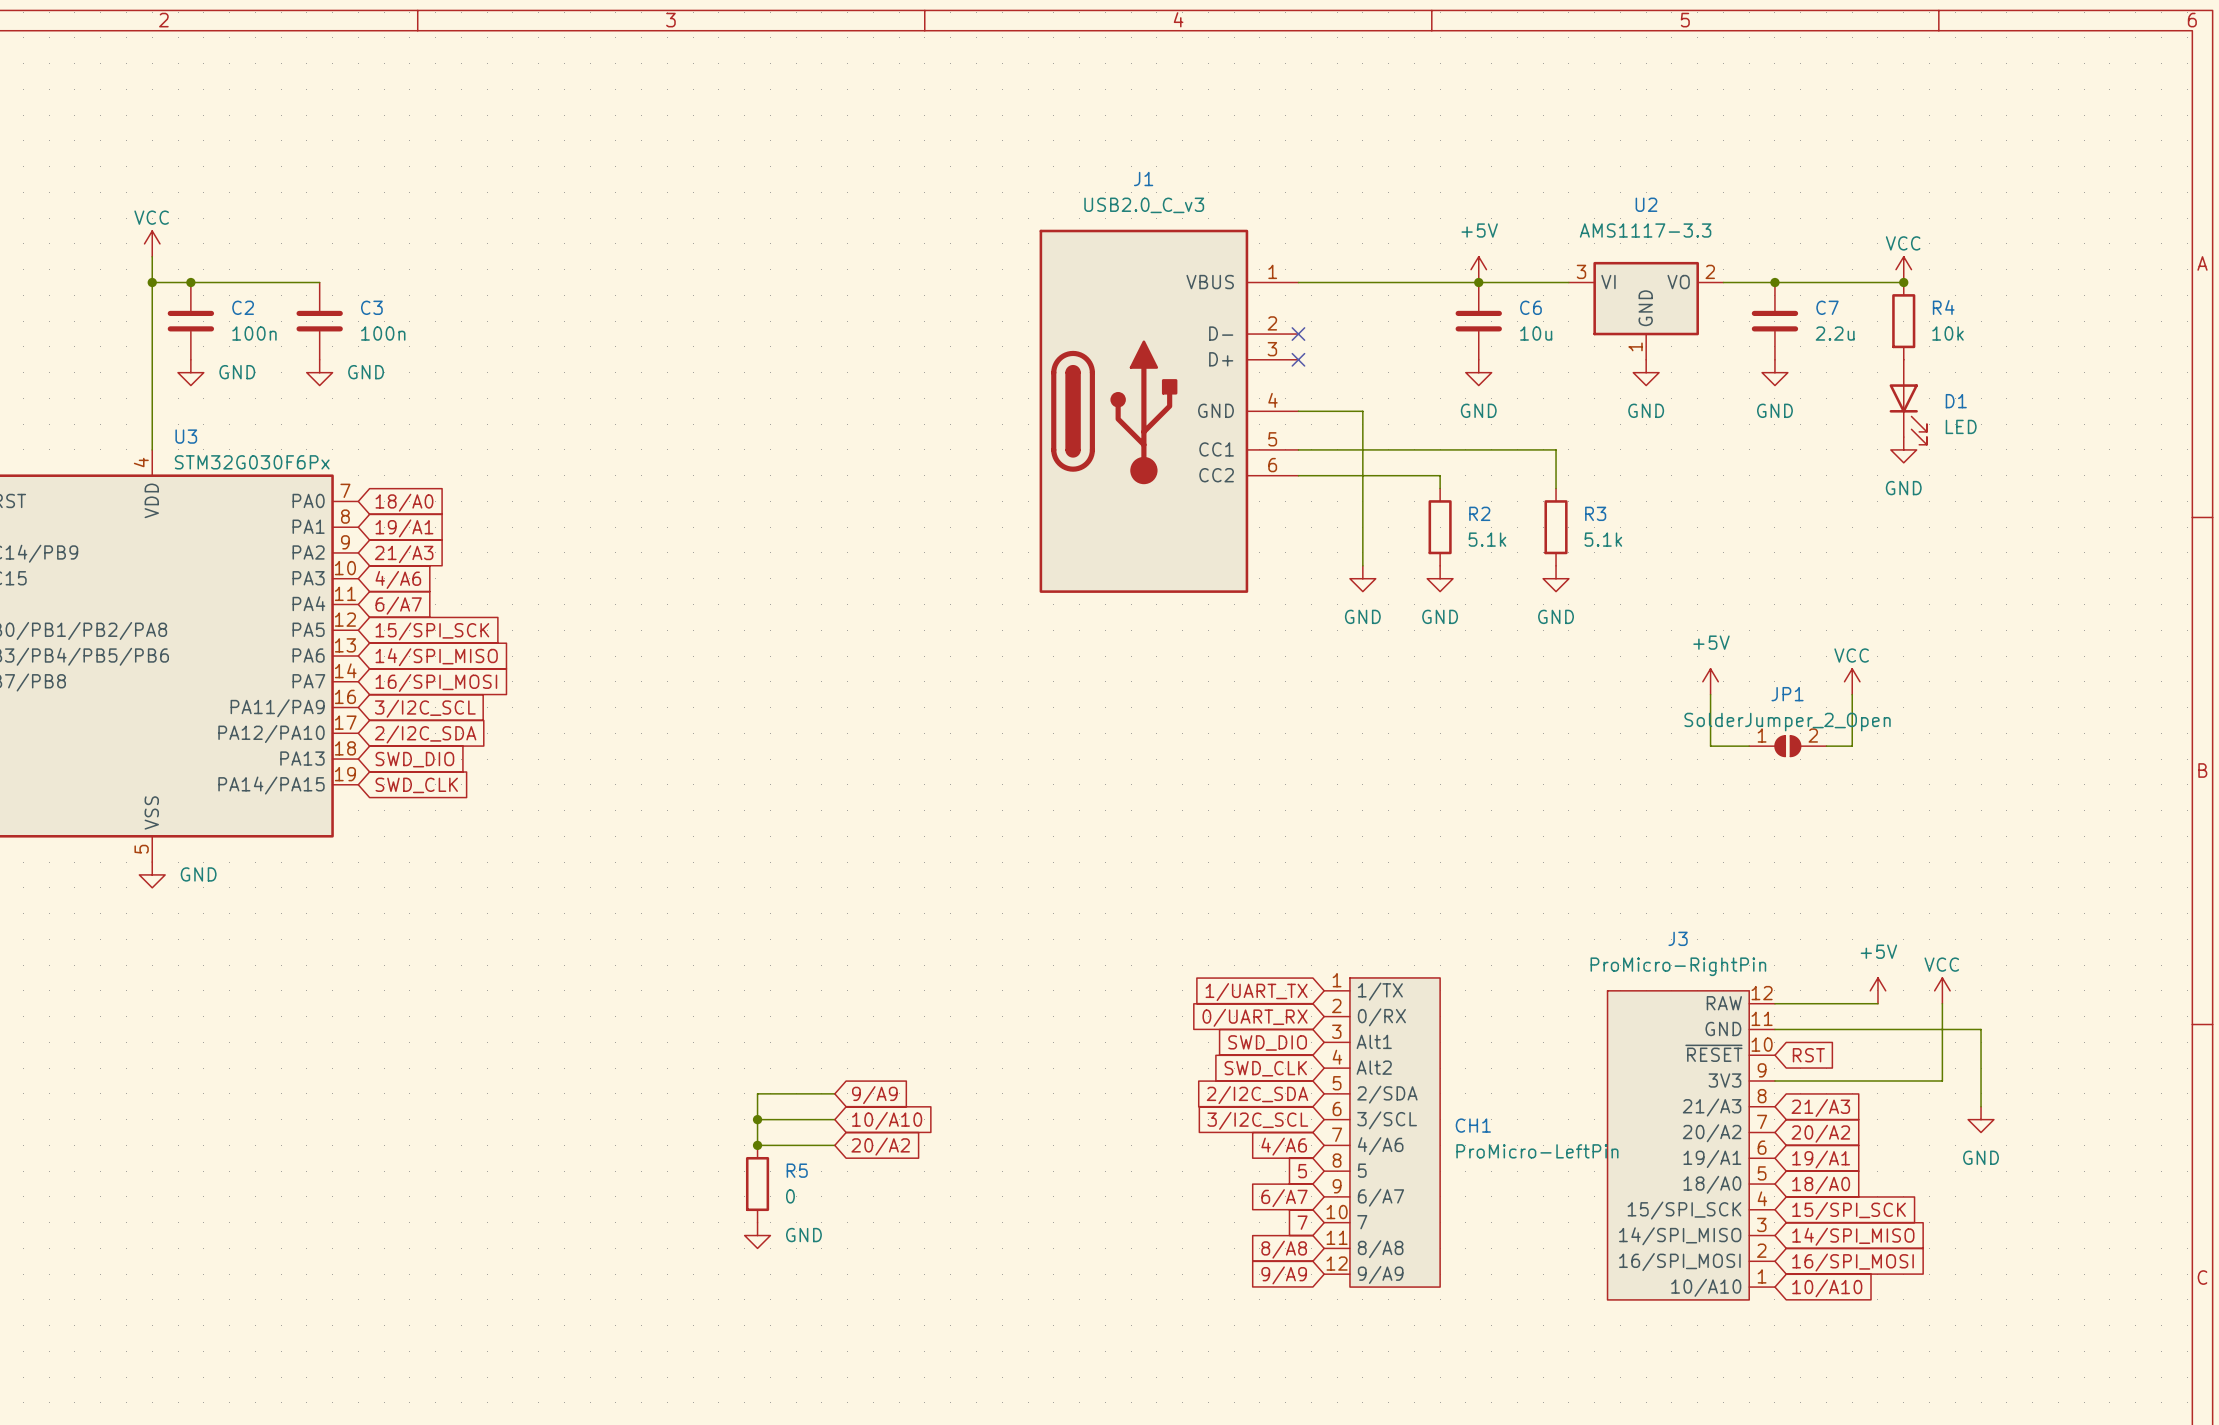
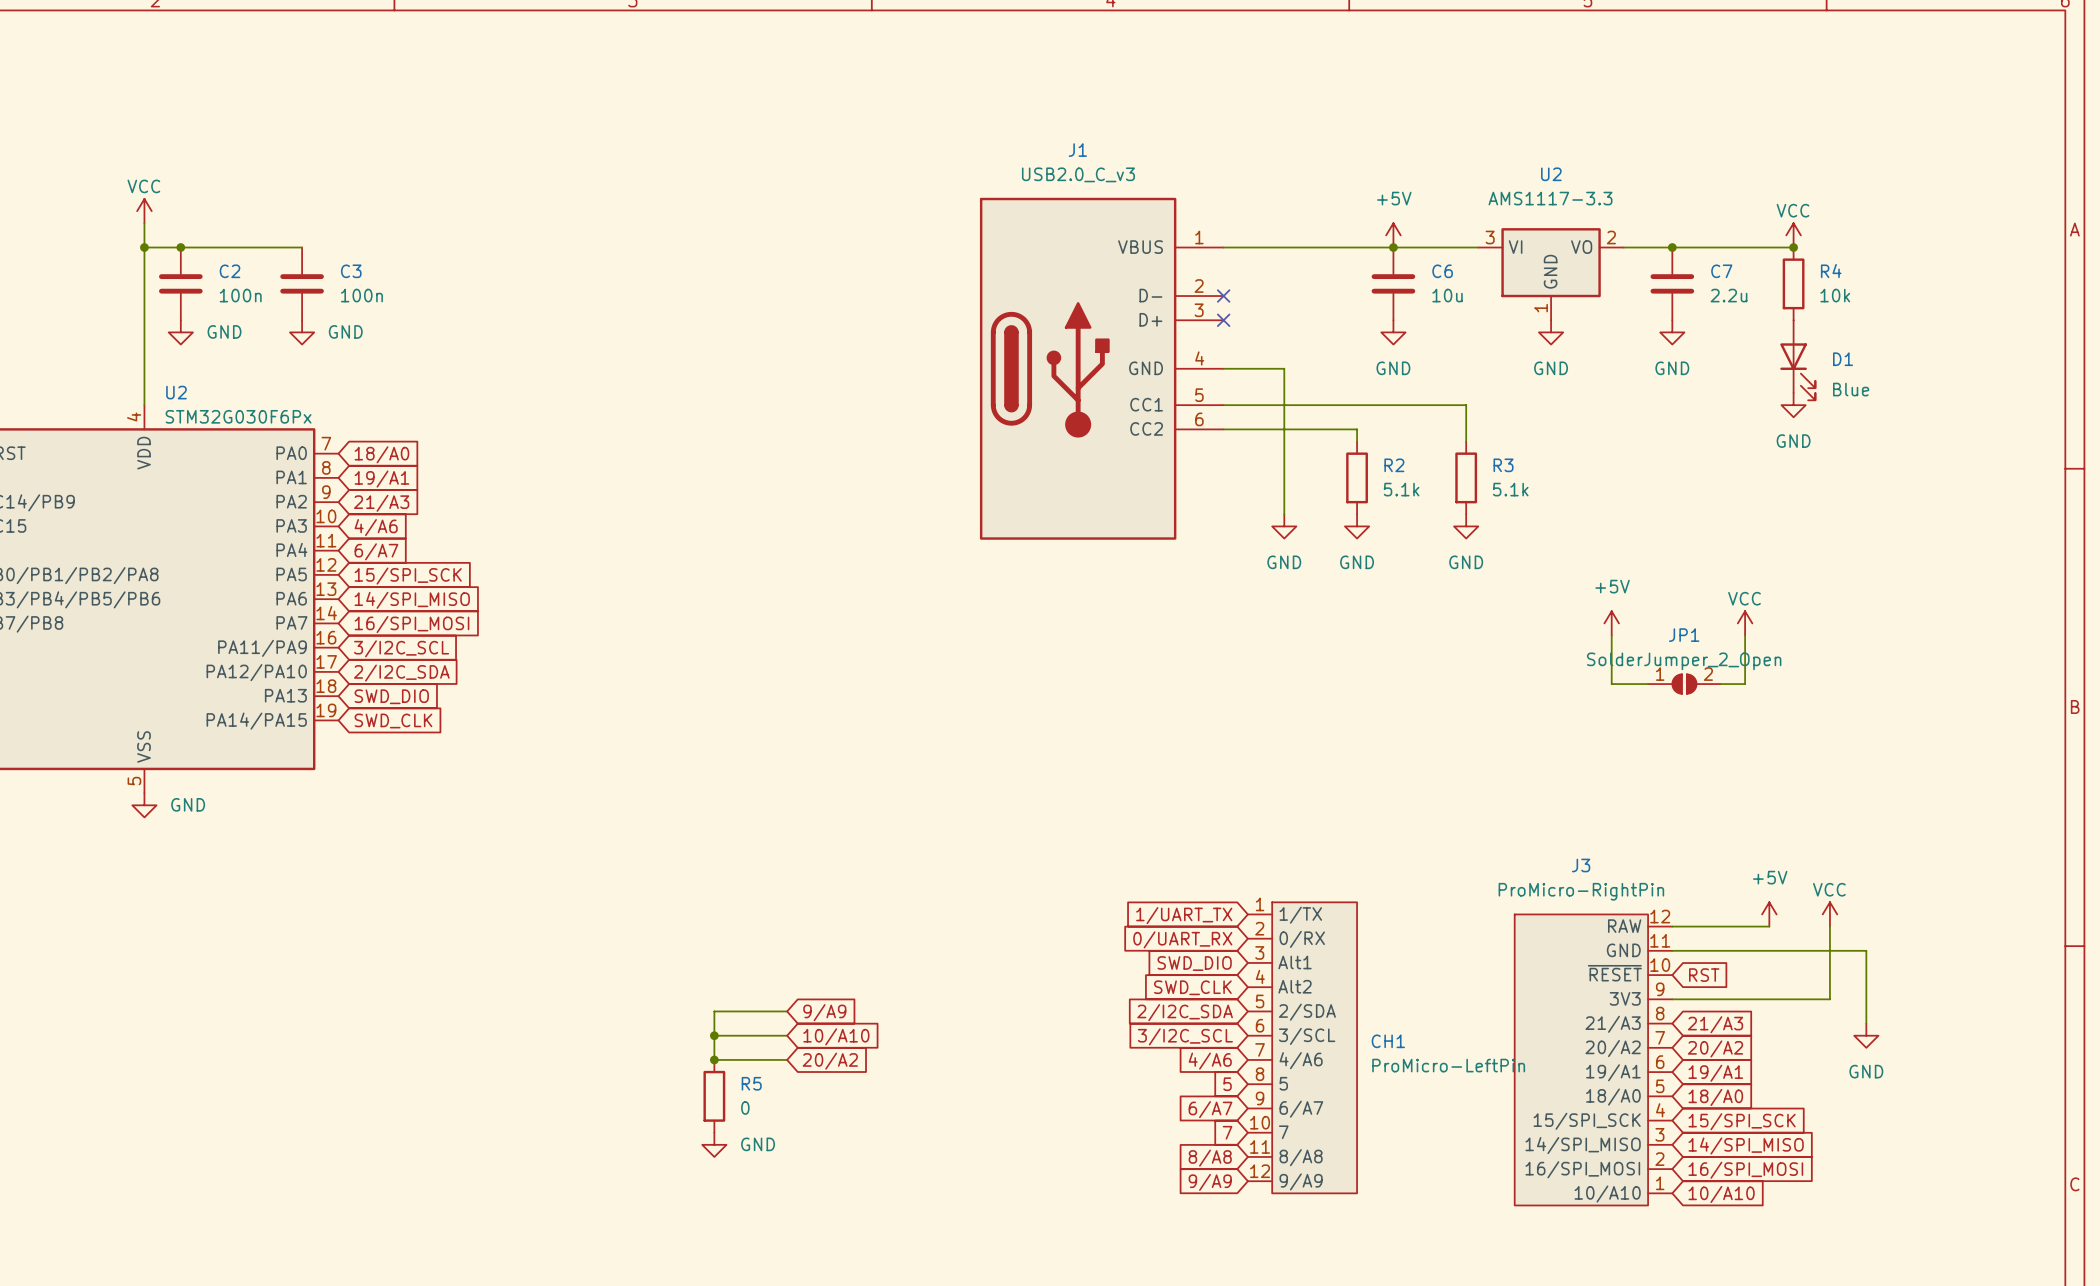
D1 value: LED (1961, 426) -> Blue (1851, 389)
U3 name: U3 (186, 436) -> U2 (176, 392)

